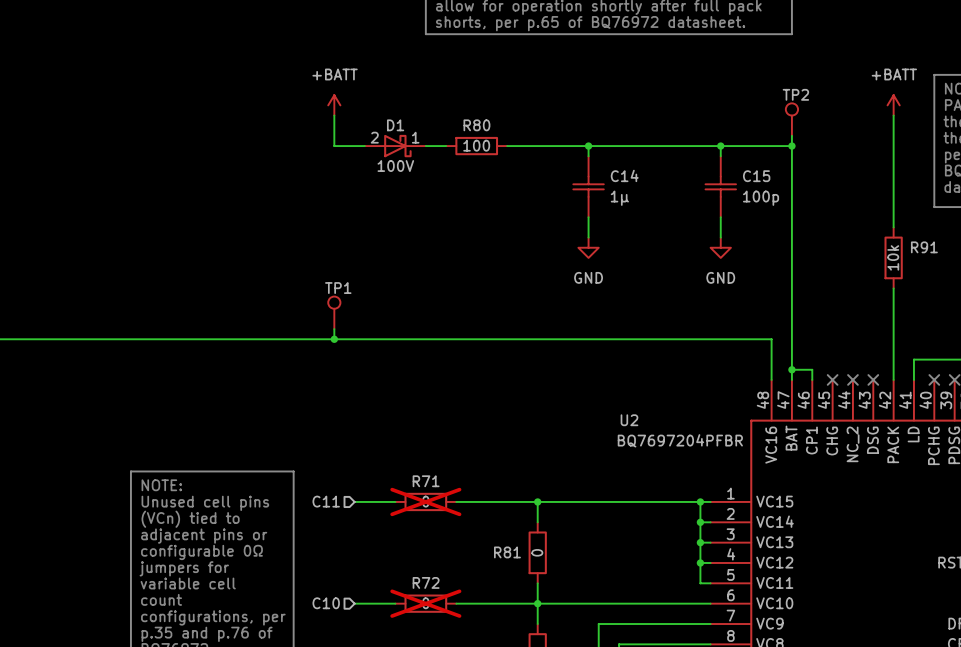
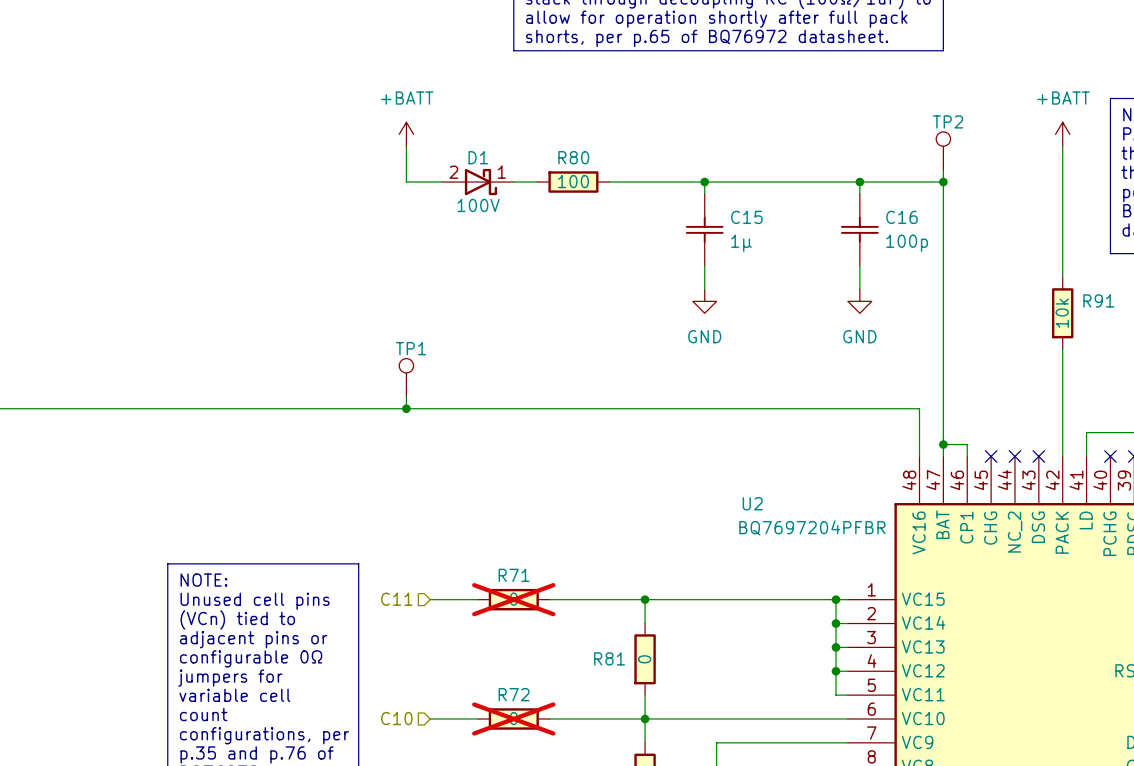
C14 name: C14 (624, 175) -> C15 (746, 217)
C15 name: C15 (756, 176) -> C16 (901, 217)

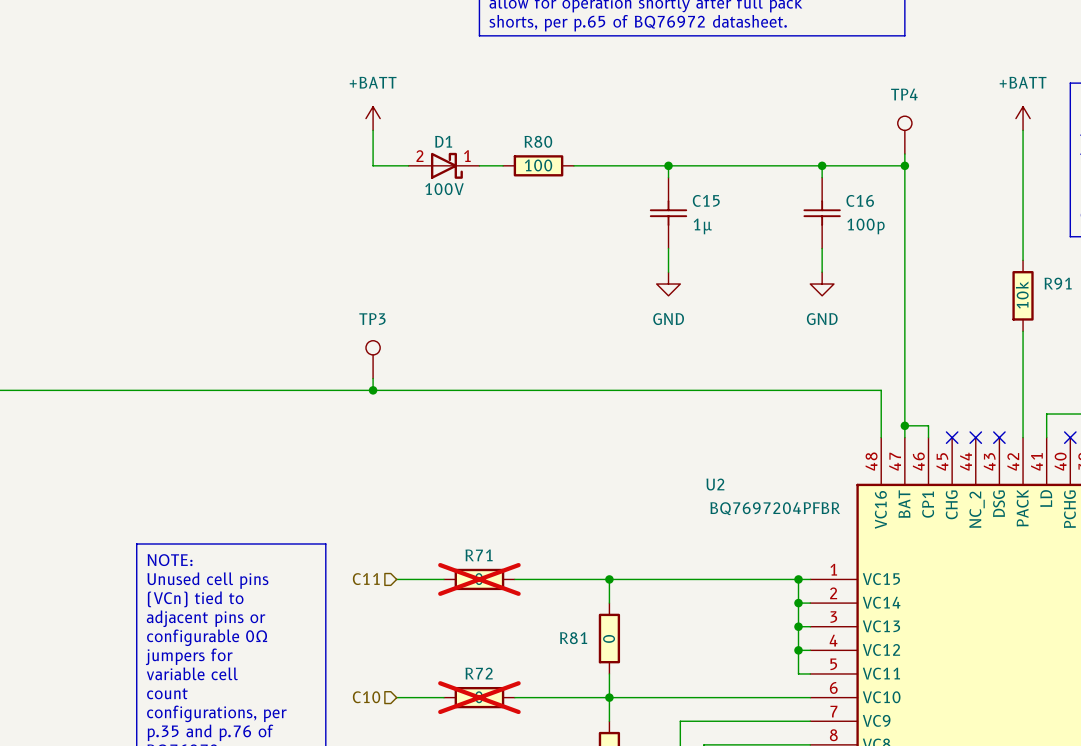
TP2 name: TP2 (948, 121) -> TP4 (904, 94)
TP1 name: TP1 (411, 348) -> TP3 (372, 319)

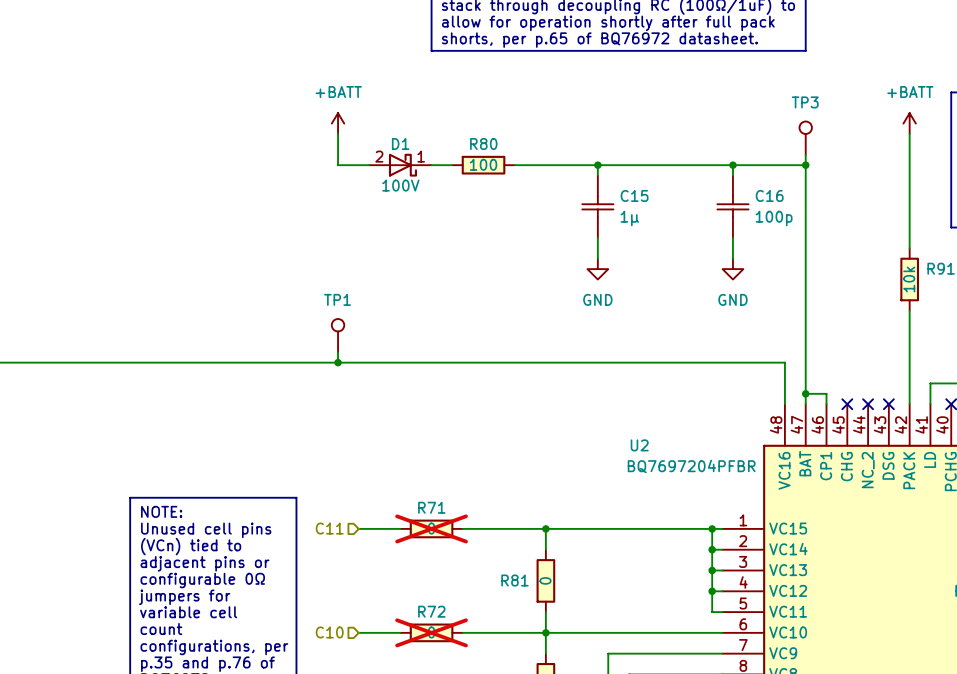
TP4 name: TP4 (904, 94) -> TP3 (805, 102)
TP3 name: TP3 (372, 319) -> TP1 (337, 299)

